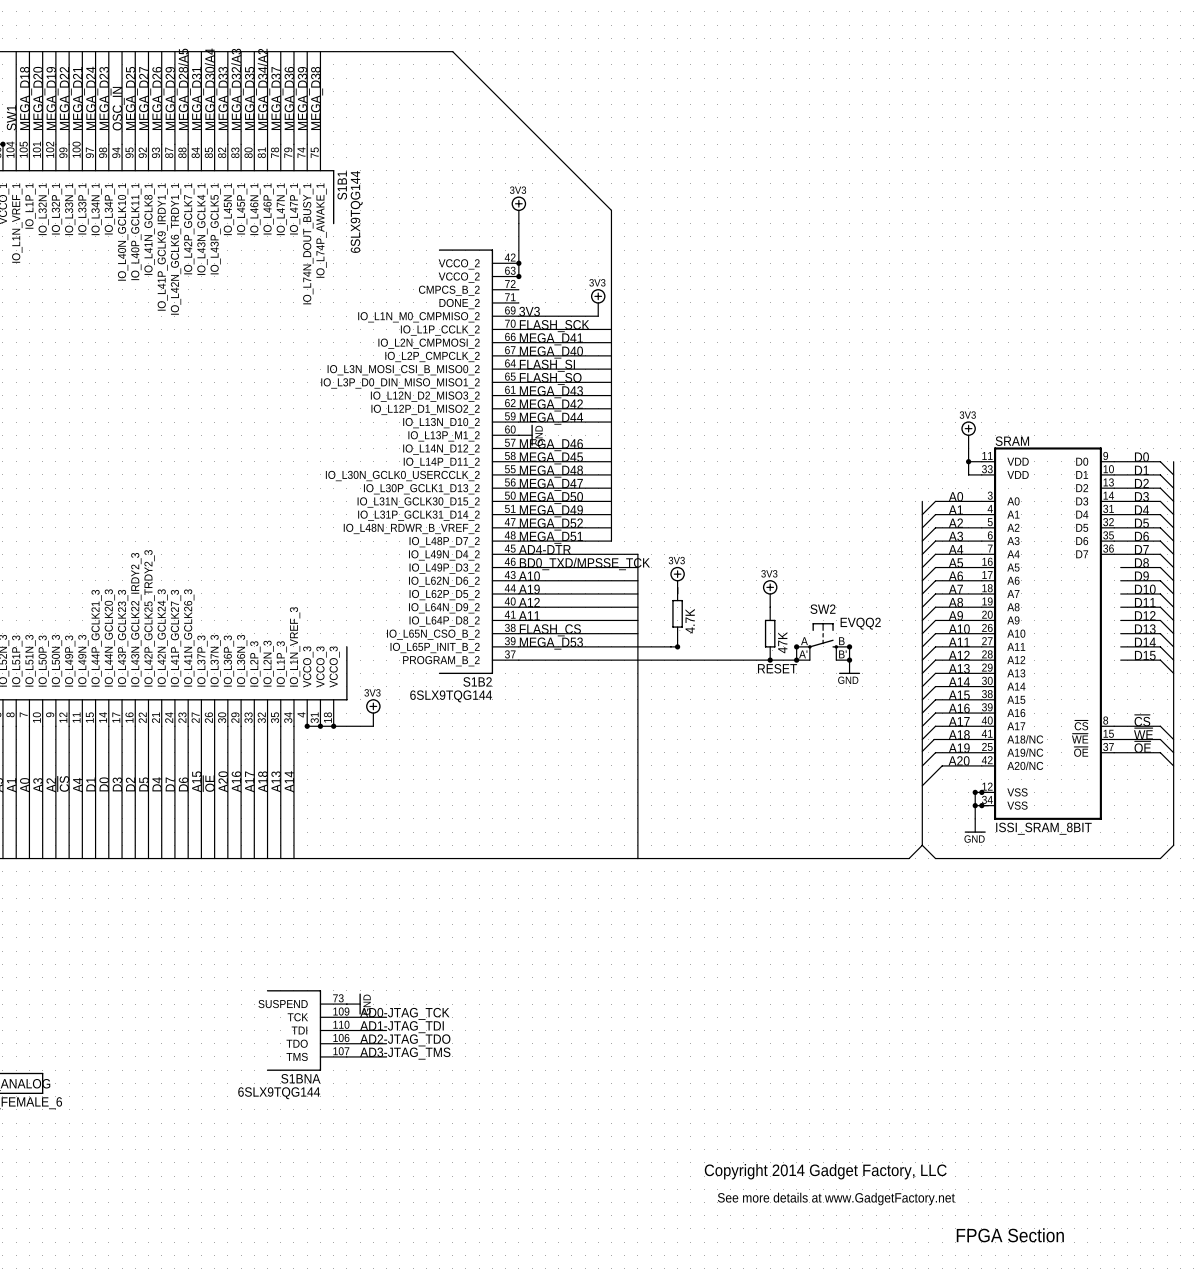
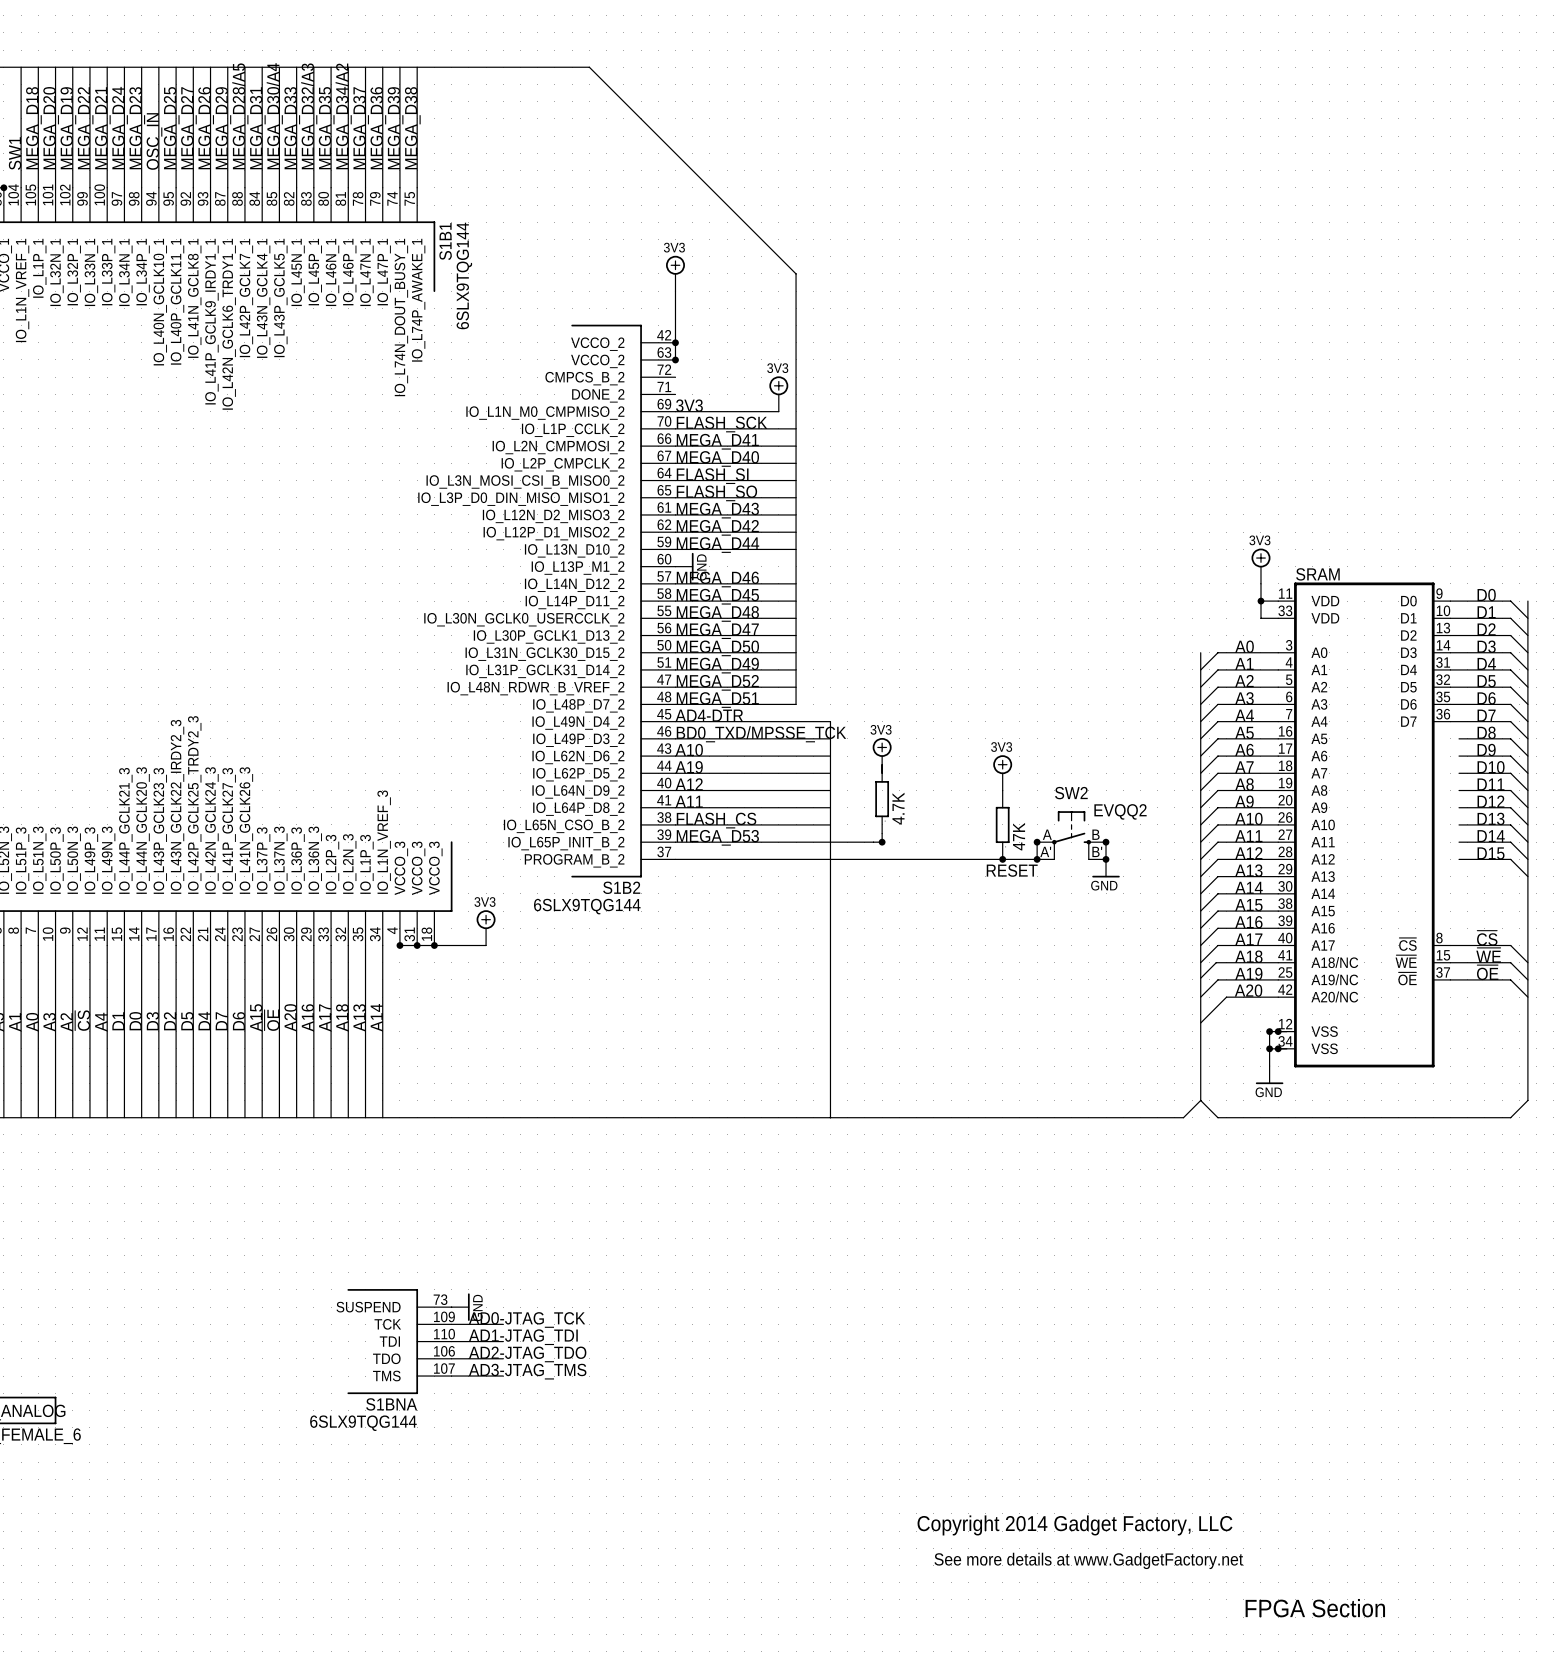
SRAM value: ISSI_SRAM_8BIT (1043, 828) -> none

